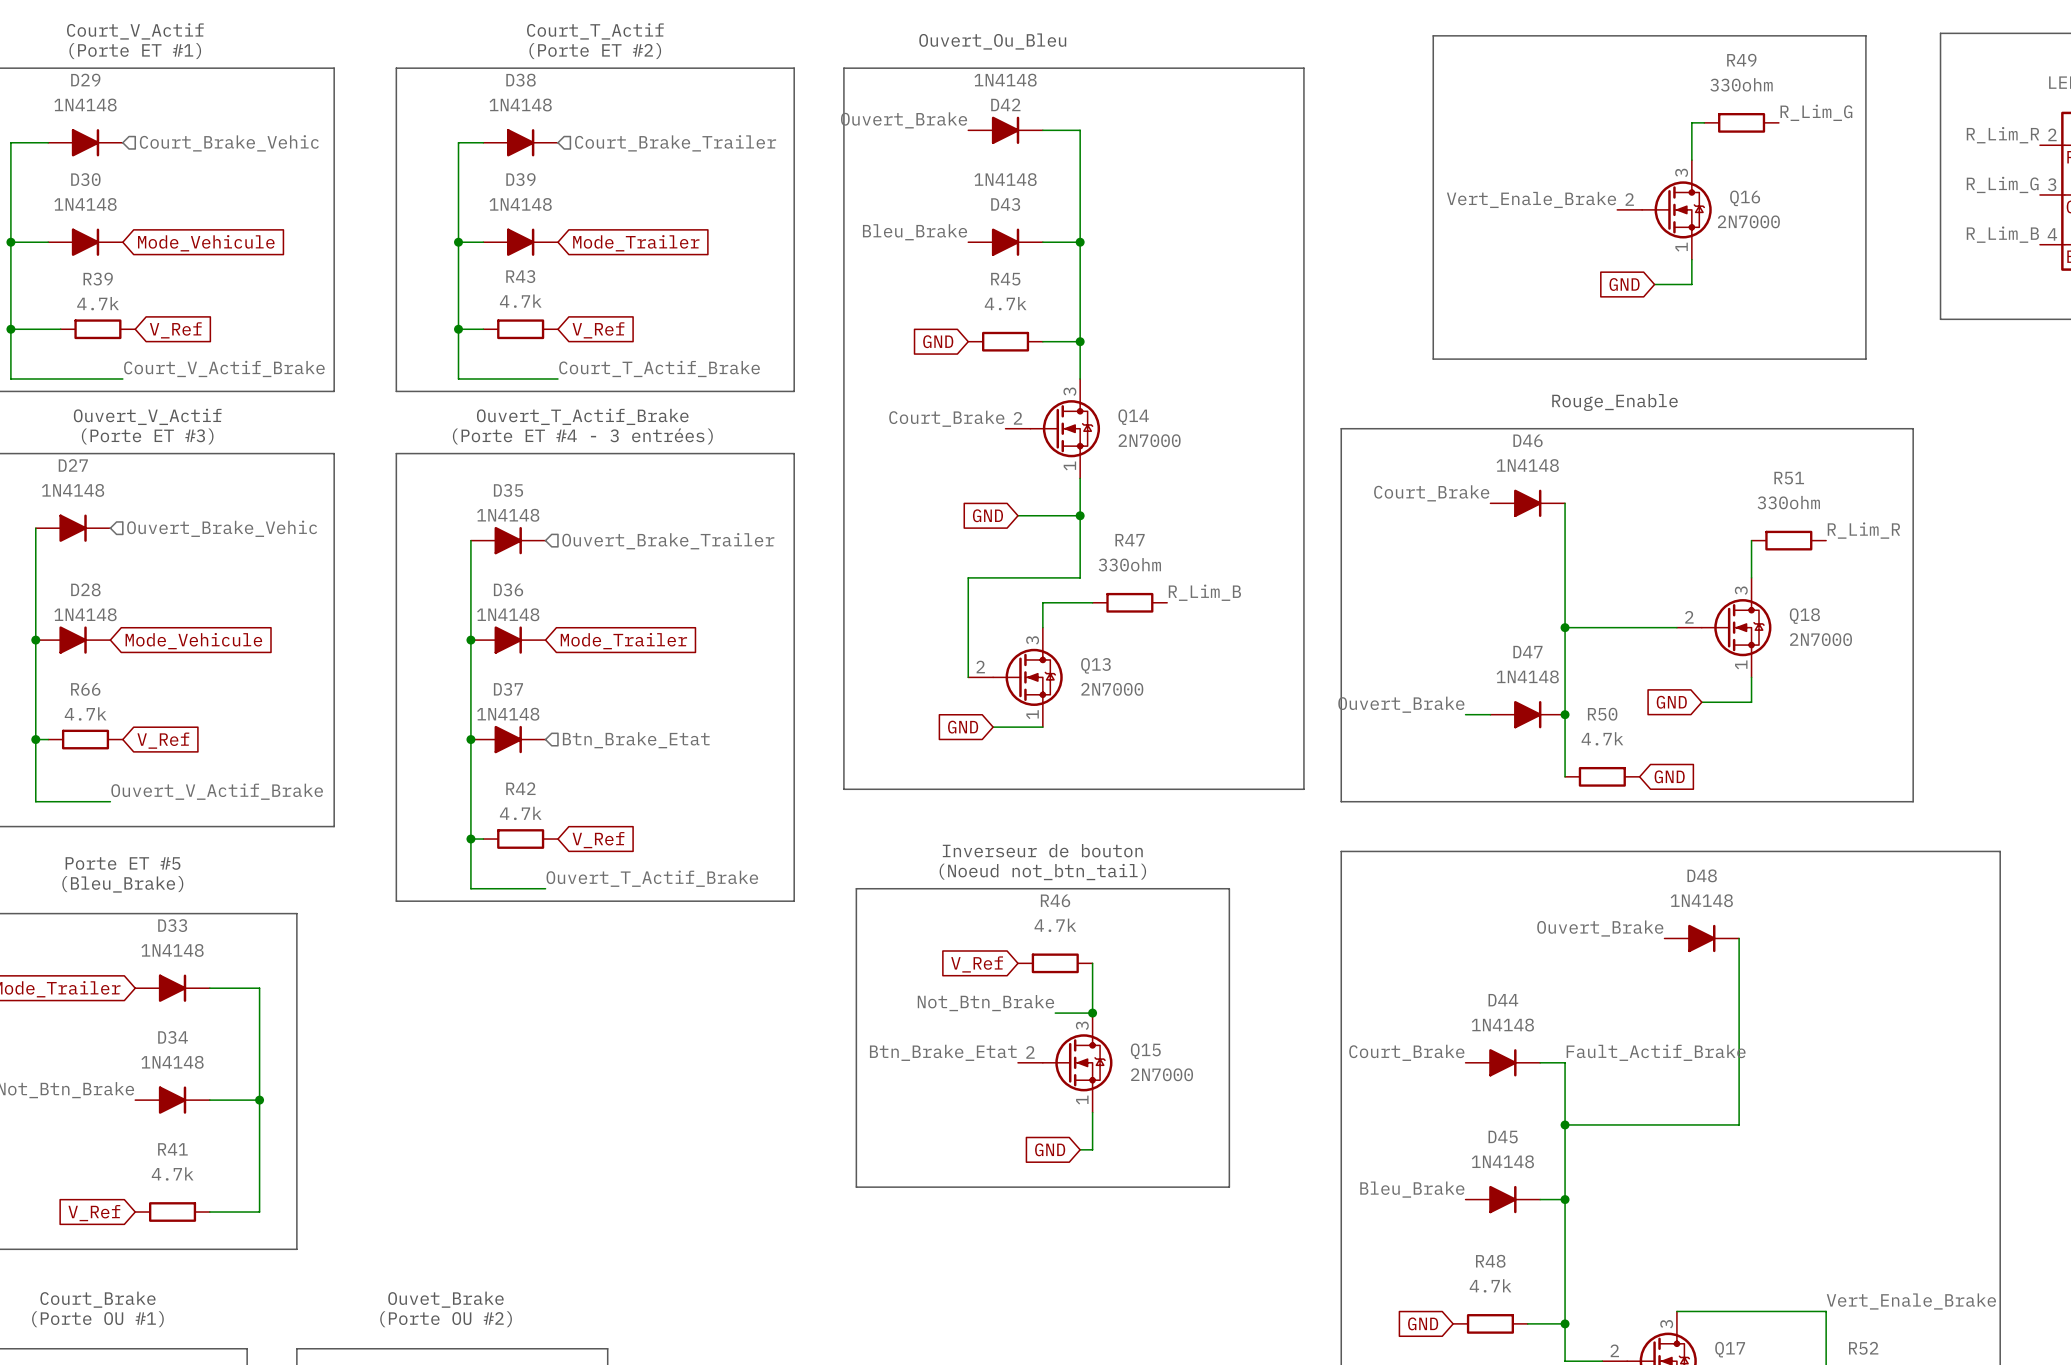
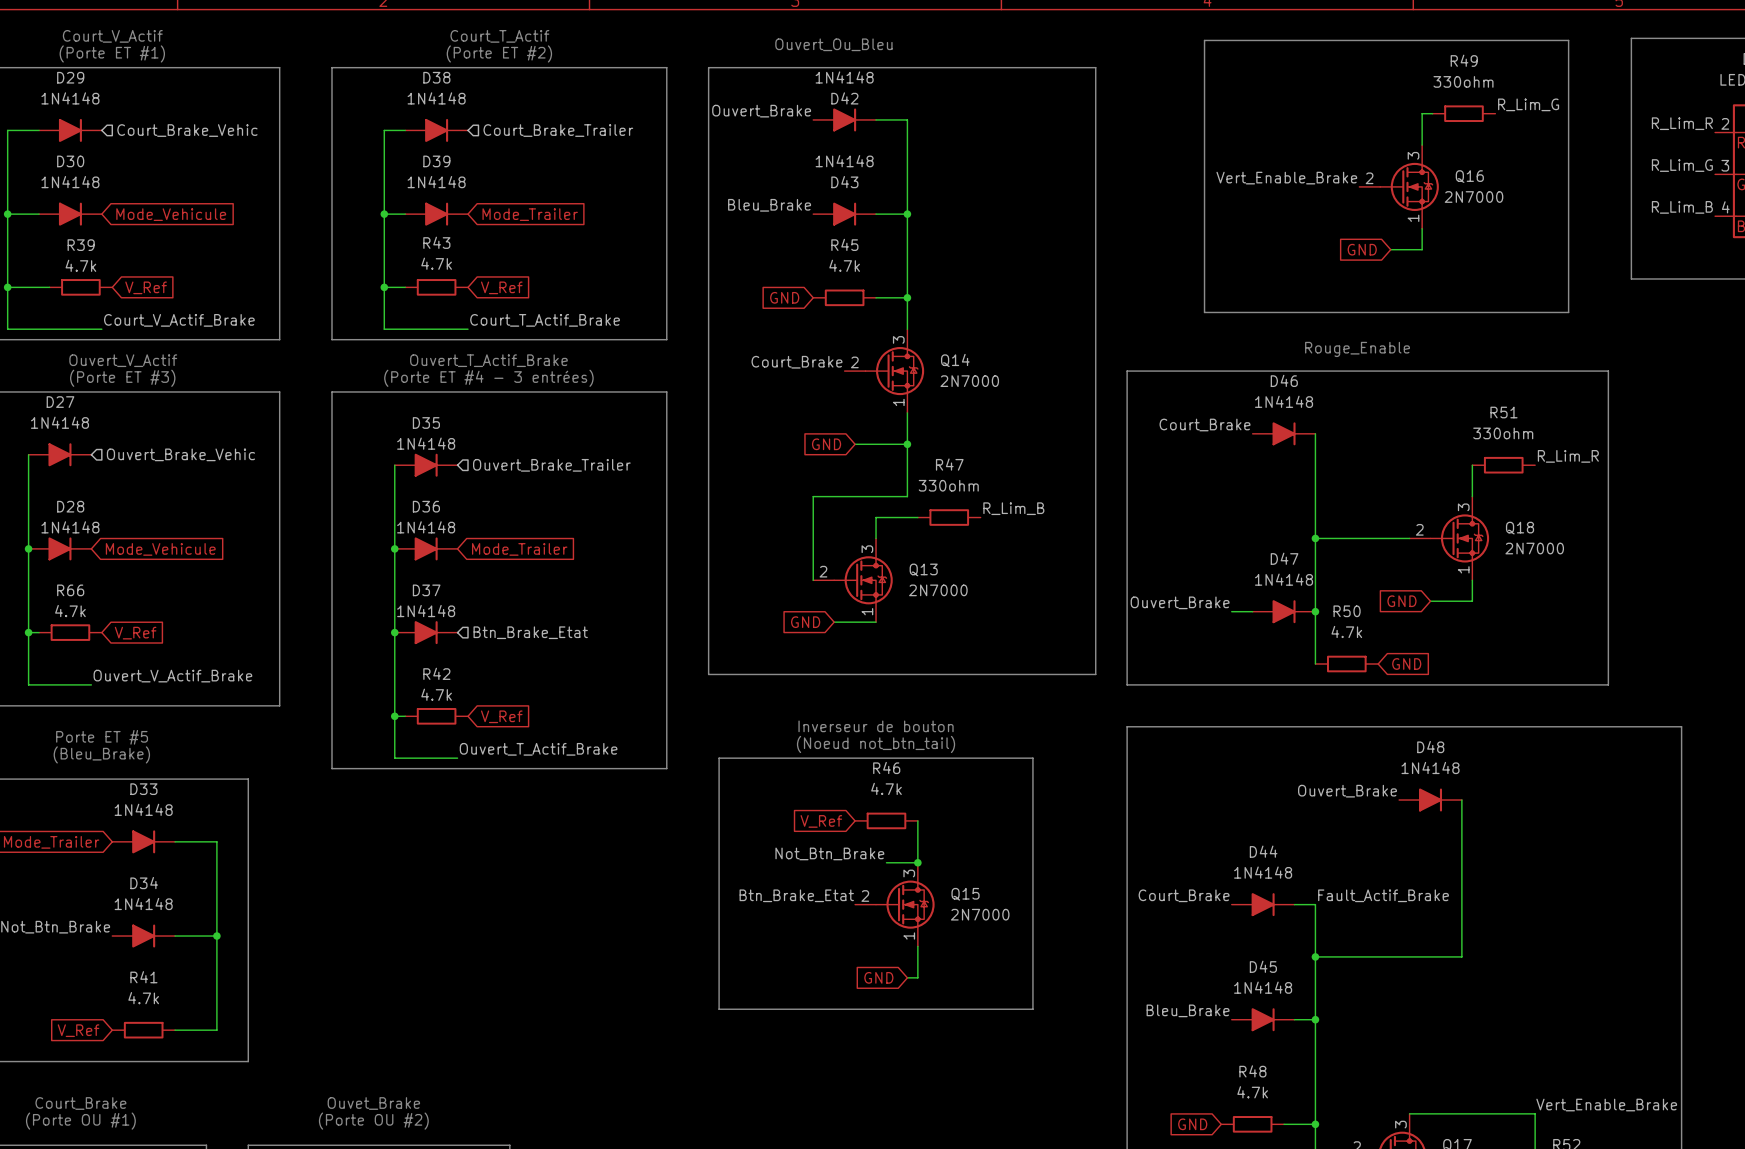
label: Vert_Enale_Brake (1531, 199) -> Vert_Enable_Brake (1286, 178)
label: Vert_Enale_Brake (1911, 1301) -> Vert_Enable_Brake (1606, 1105)

